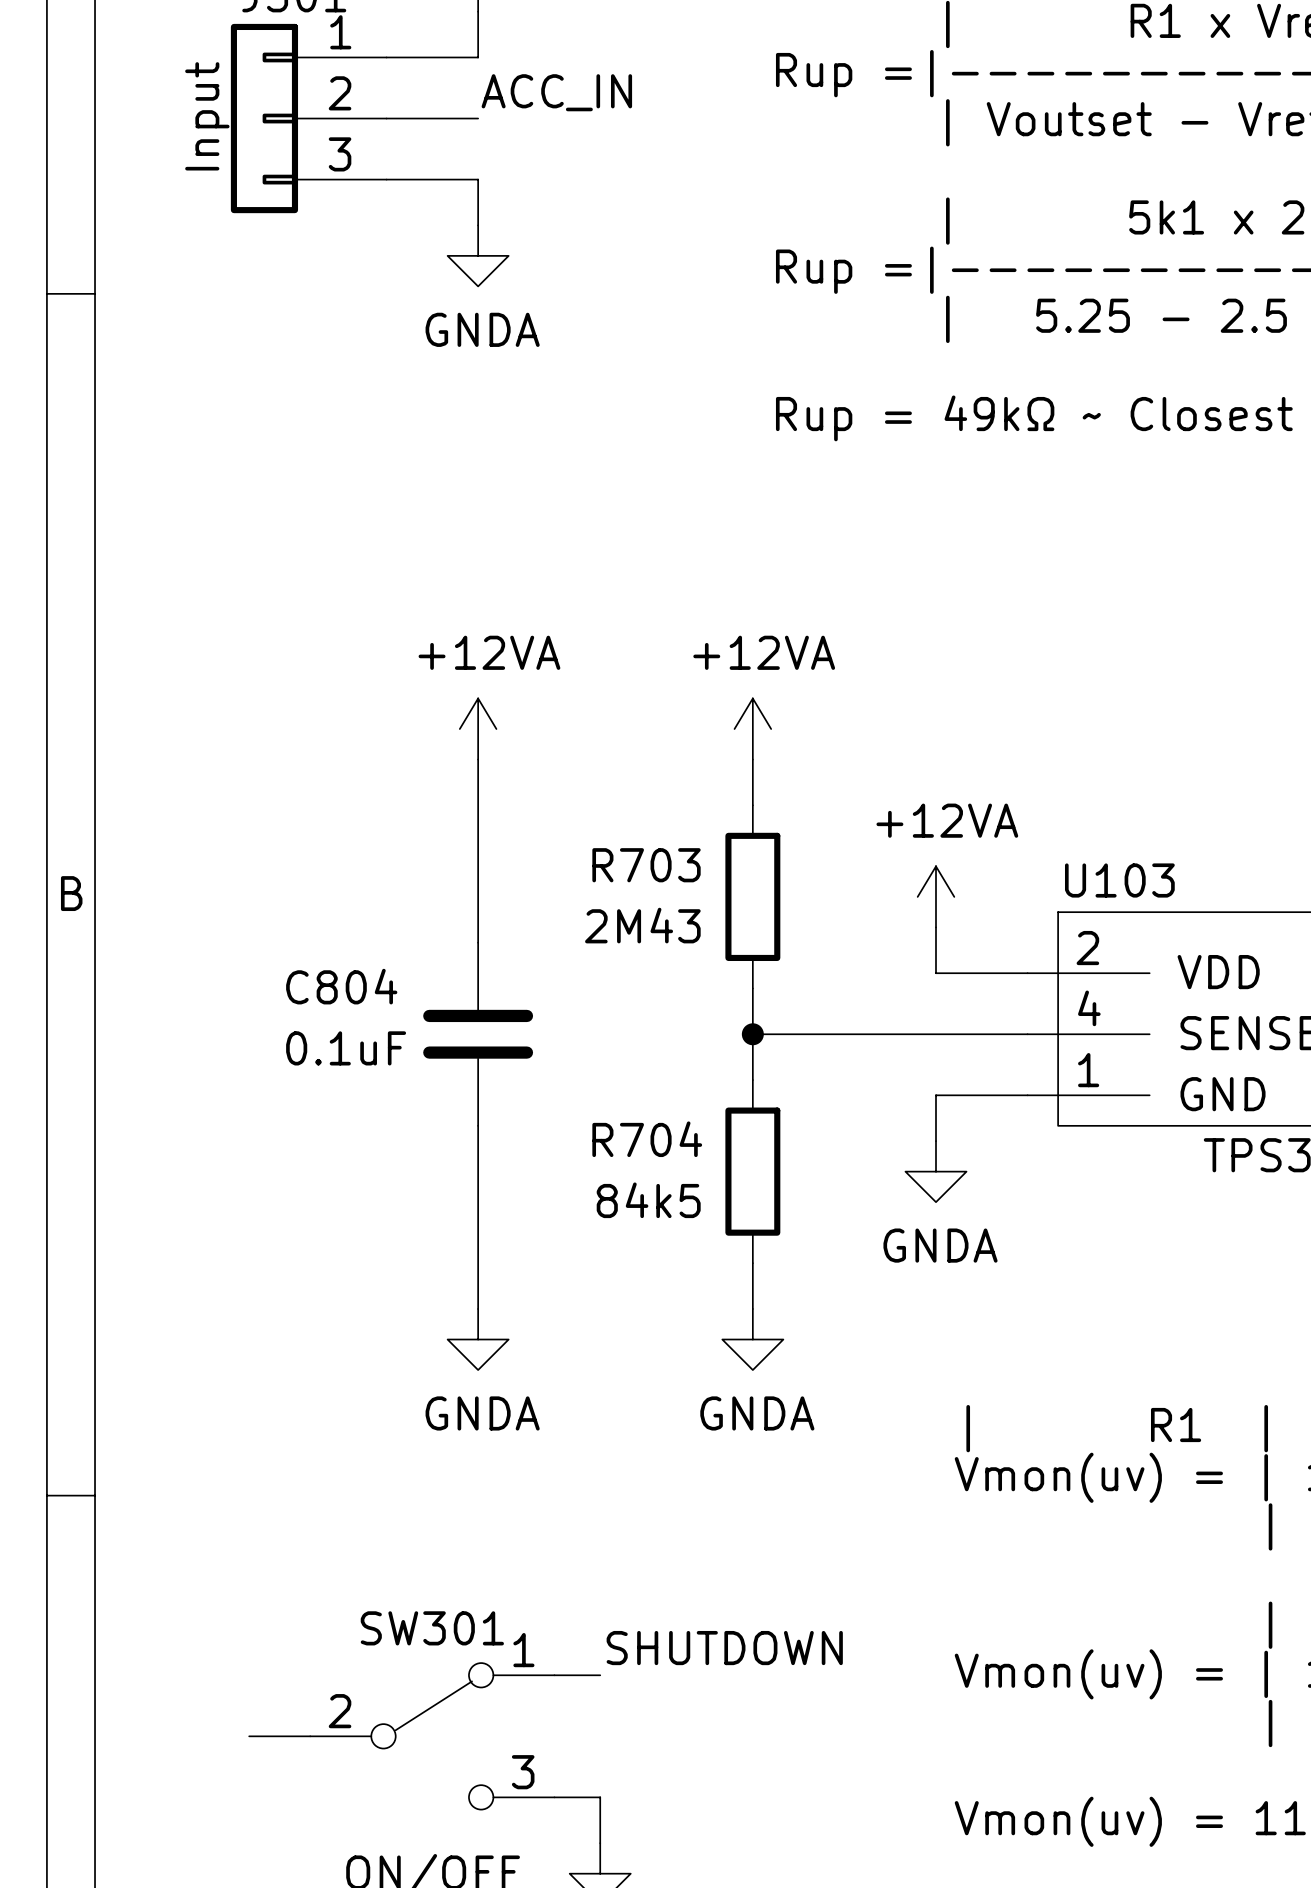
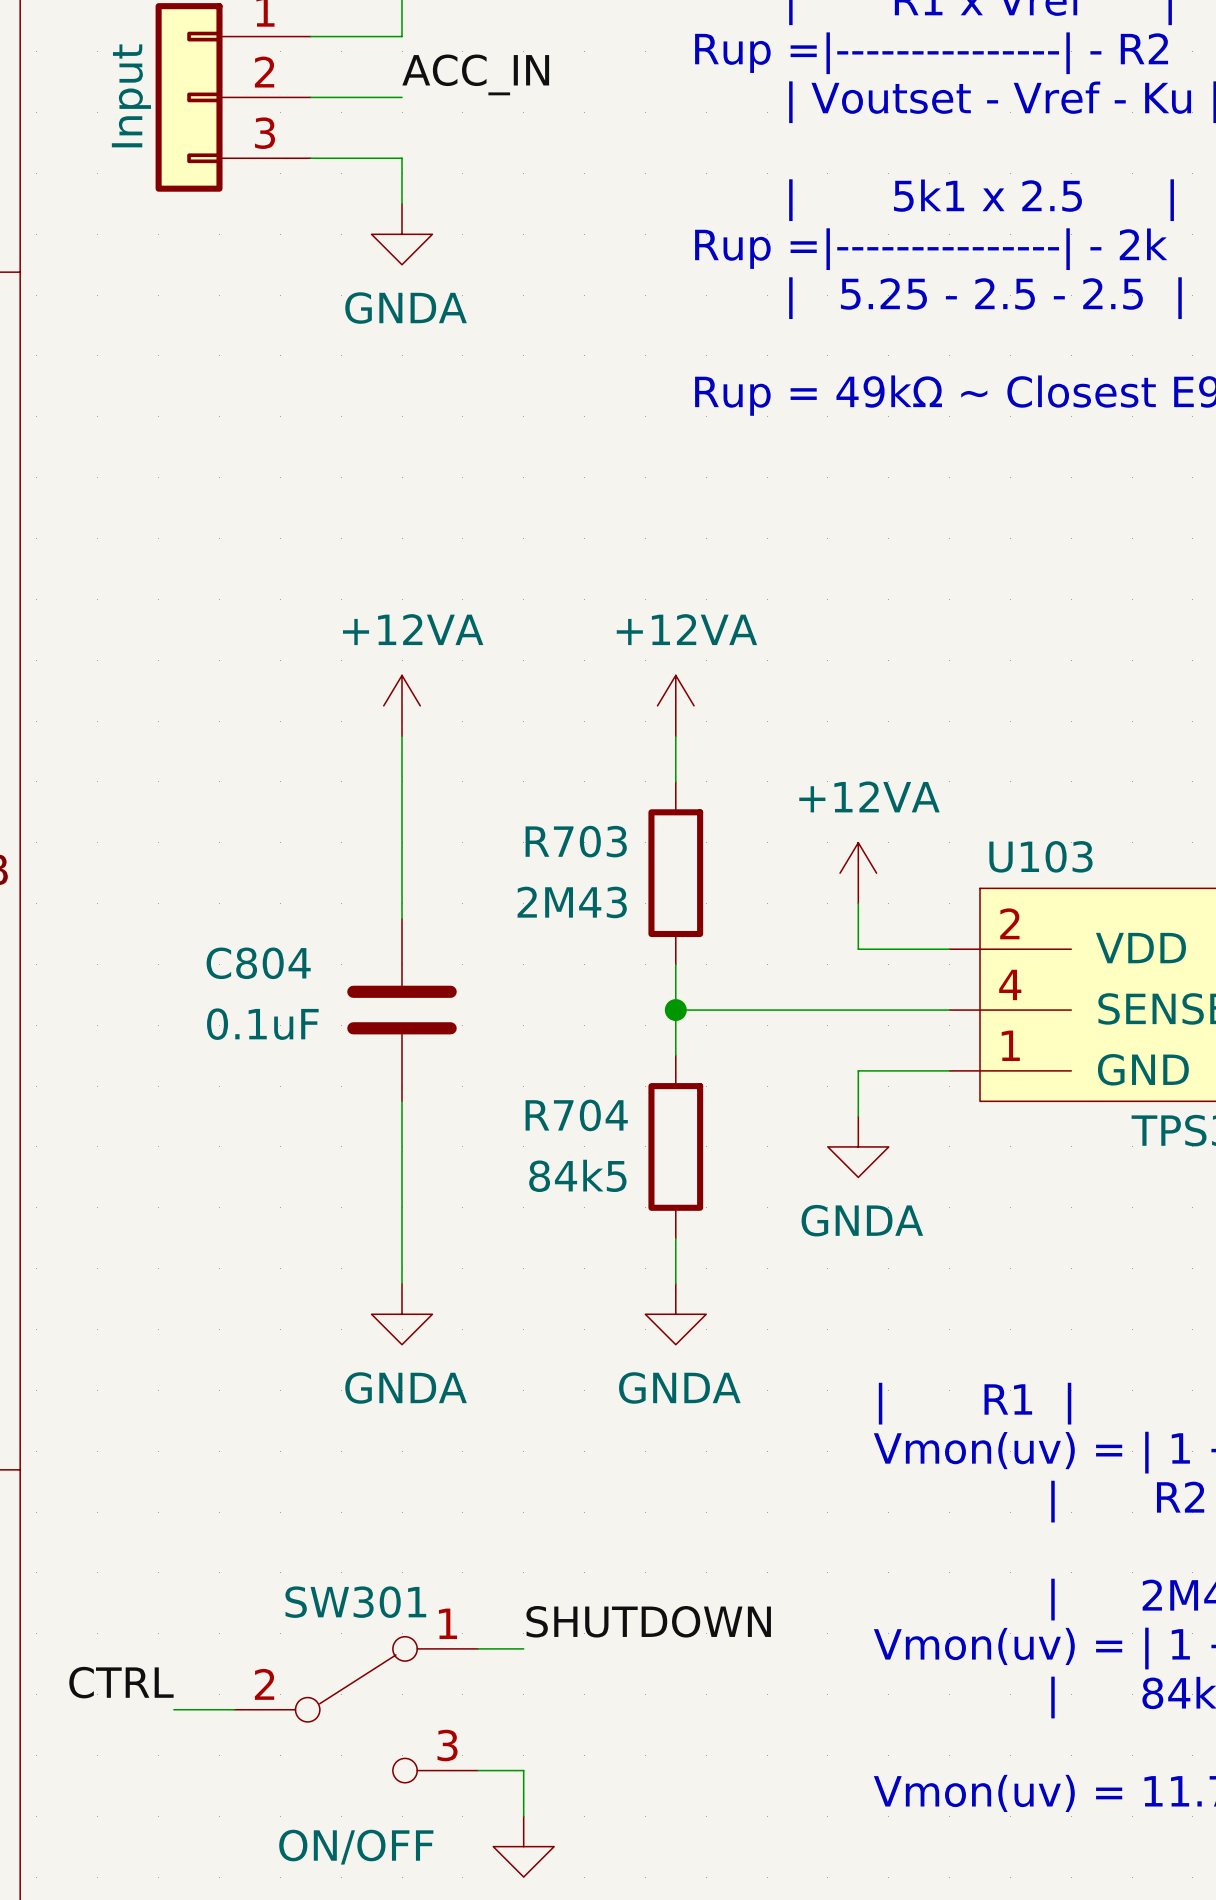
label: none -> CTRL (121, 1682)

